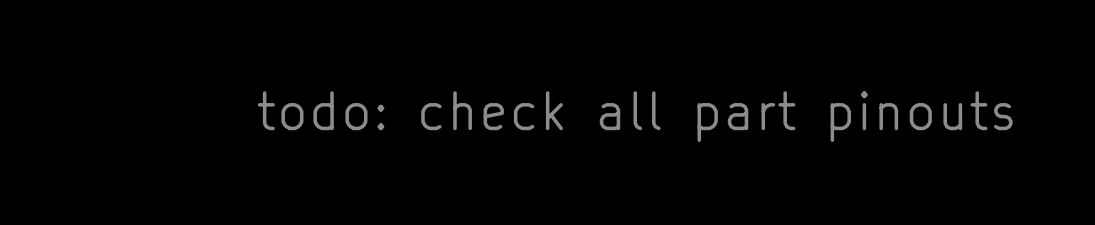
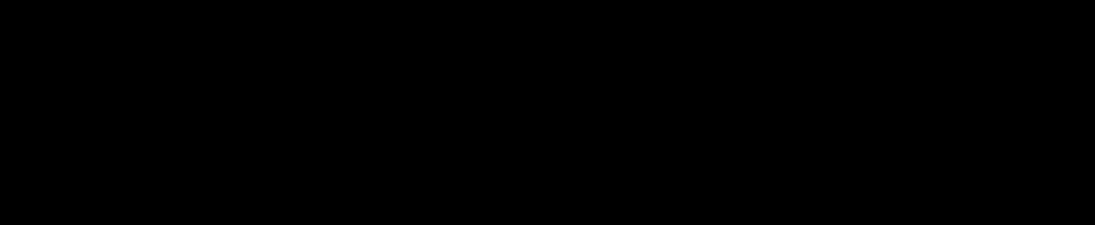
text: todo: check all part pinouts (635, 116) -> none

